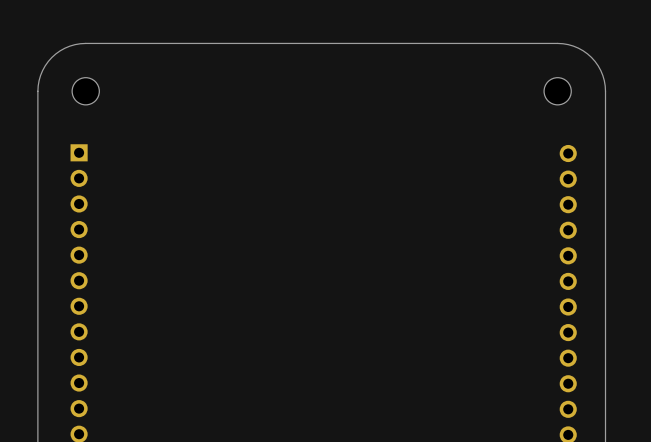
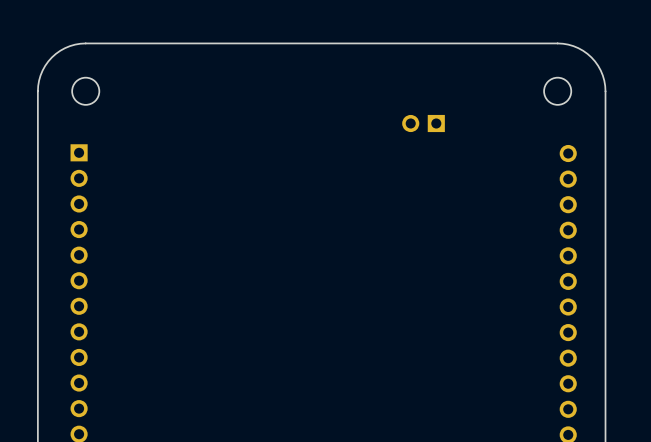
part: none -> (423, 123)

